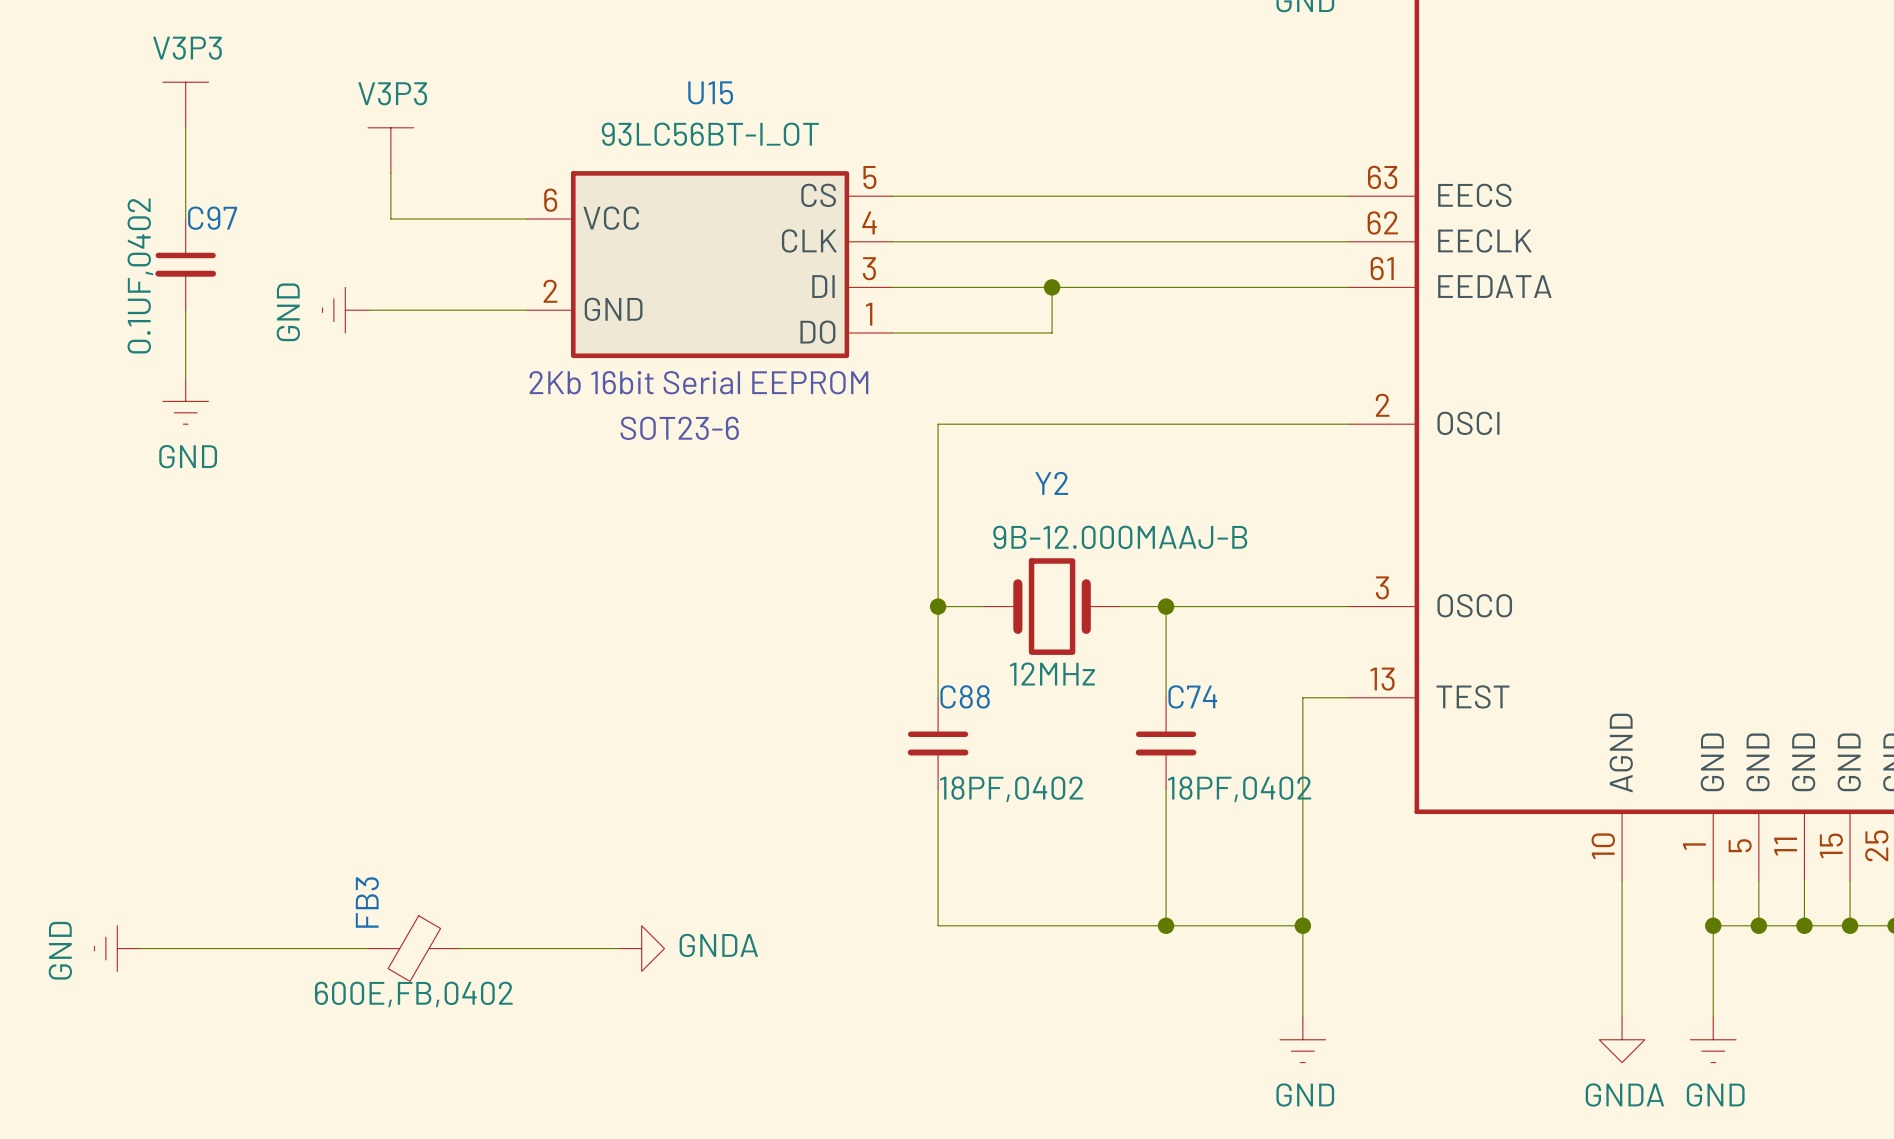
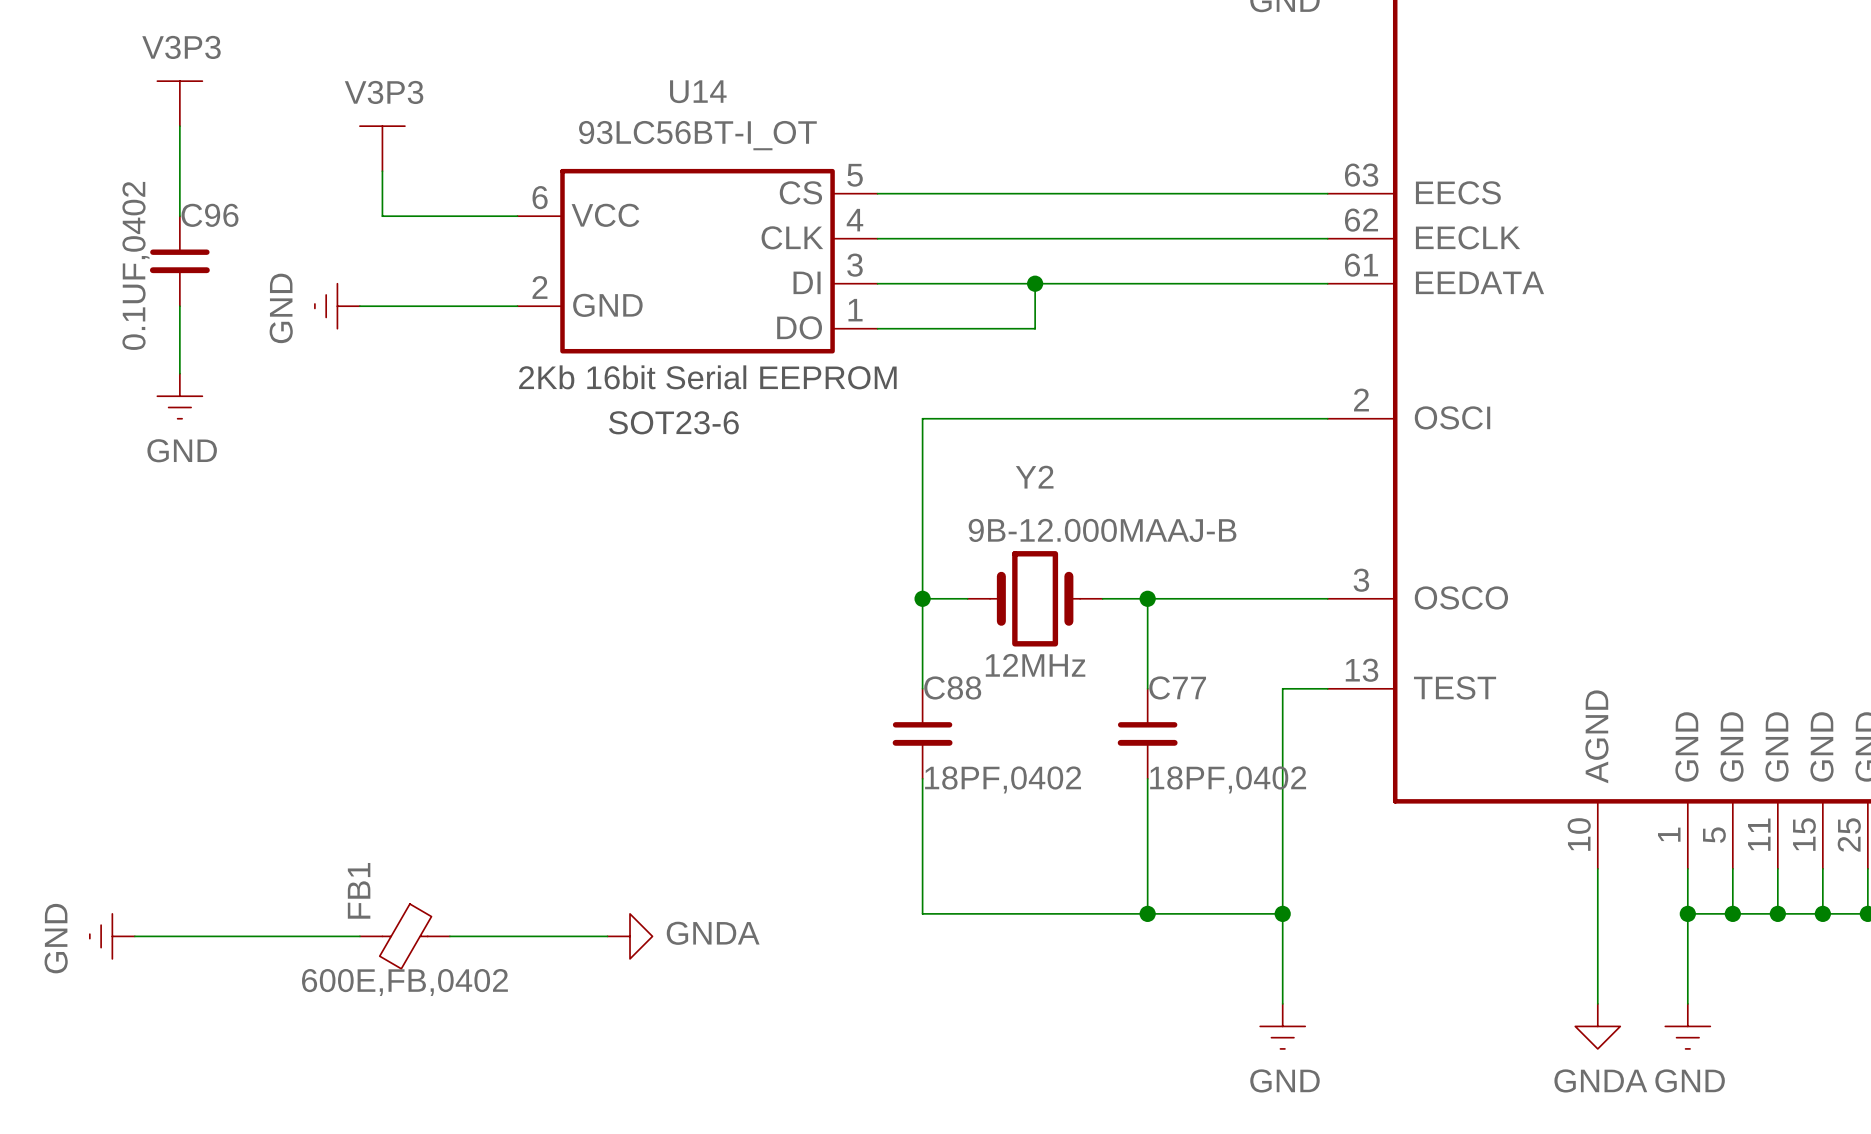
U15 name: U15 (710, 92) -> U14 (698, 91)
C97 name: C97 (212, 218) -> C96 (209, 215)
C74 name: C74 (1192, 696) -> C77 (1177, 687)
FB3 name: FB3 (367, 902) -> FB1 (359, 890)

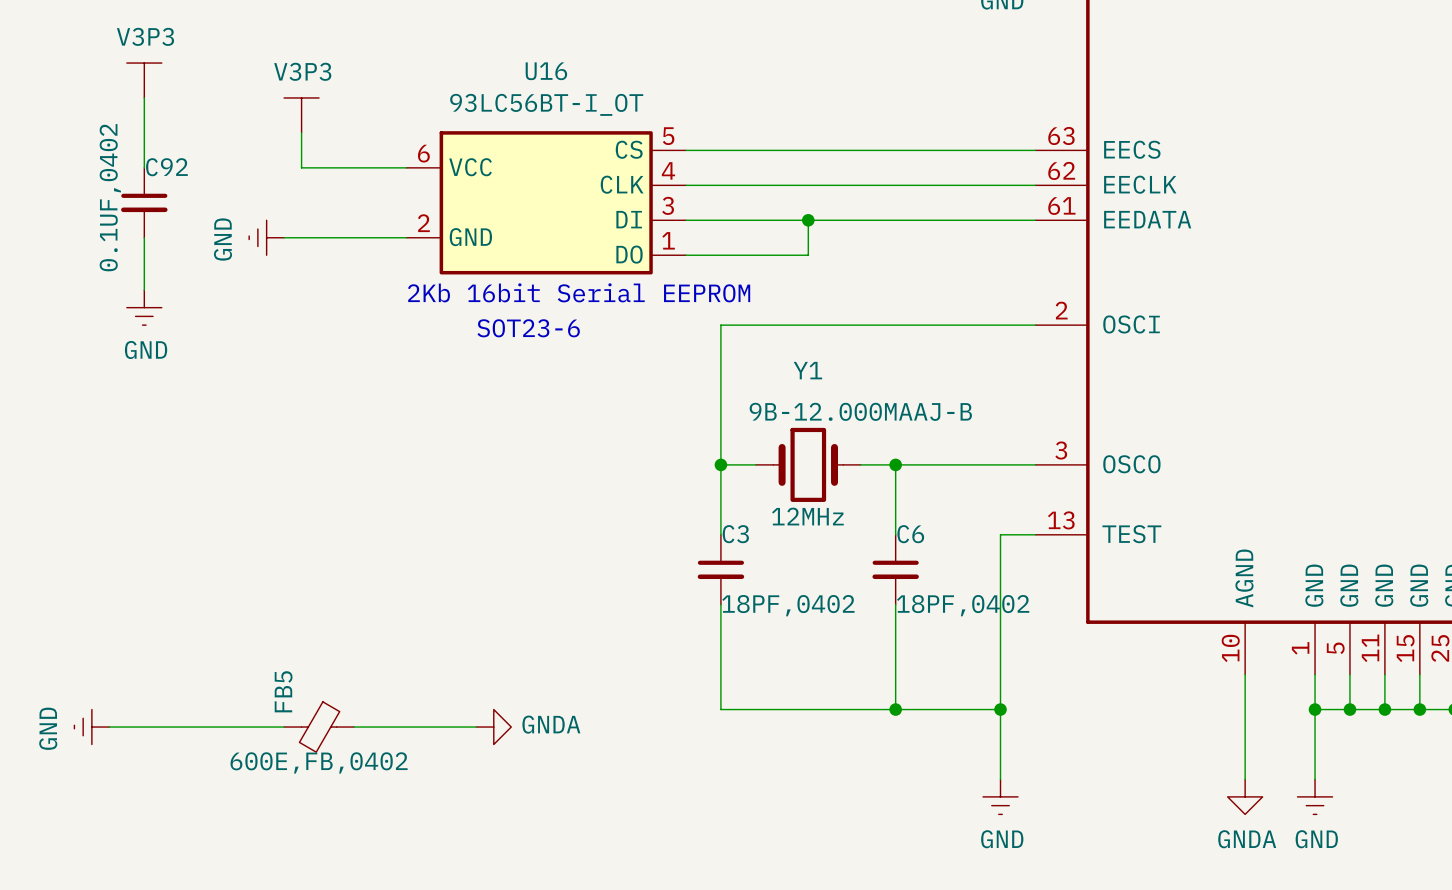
U14 name: U14 (698, 91) -> U16 (546, 71)
C96 name: C96 (209, 215) -> C92 (166, 167)
Y2 name: Y2 (1034, 477) -> Y1 (807, 370)
C88 name: C88 (952, 687) -> C3 (735, 534)
C77 name: C77 (1177, 687) -> C6 (910, 534)
FB1 name: FB1 (359, 890) -> FB5 (283, 691)

